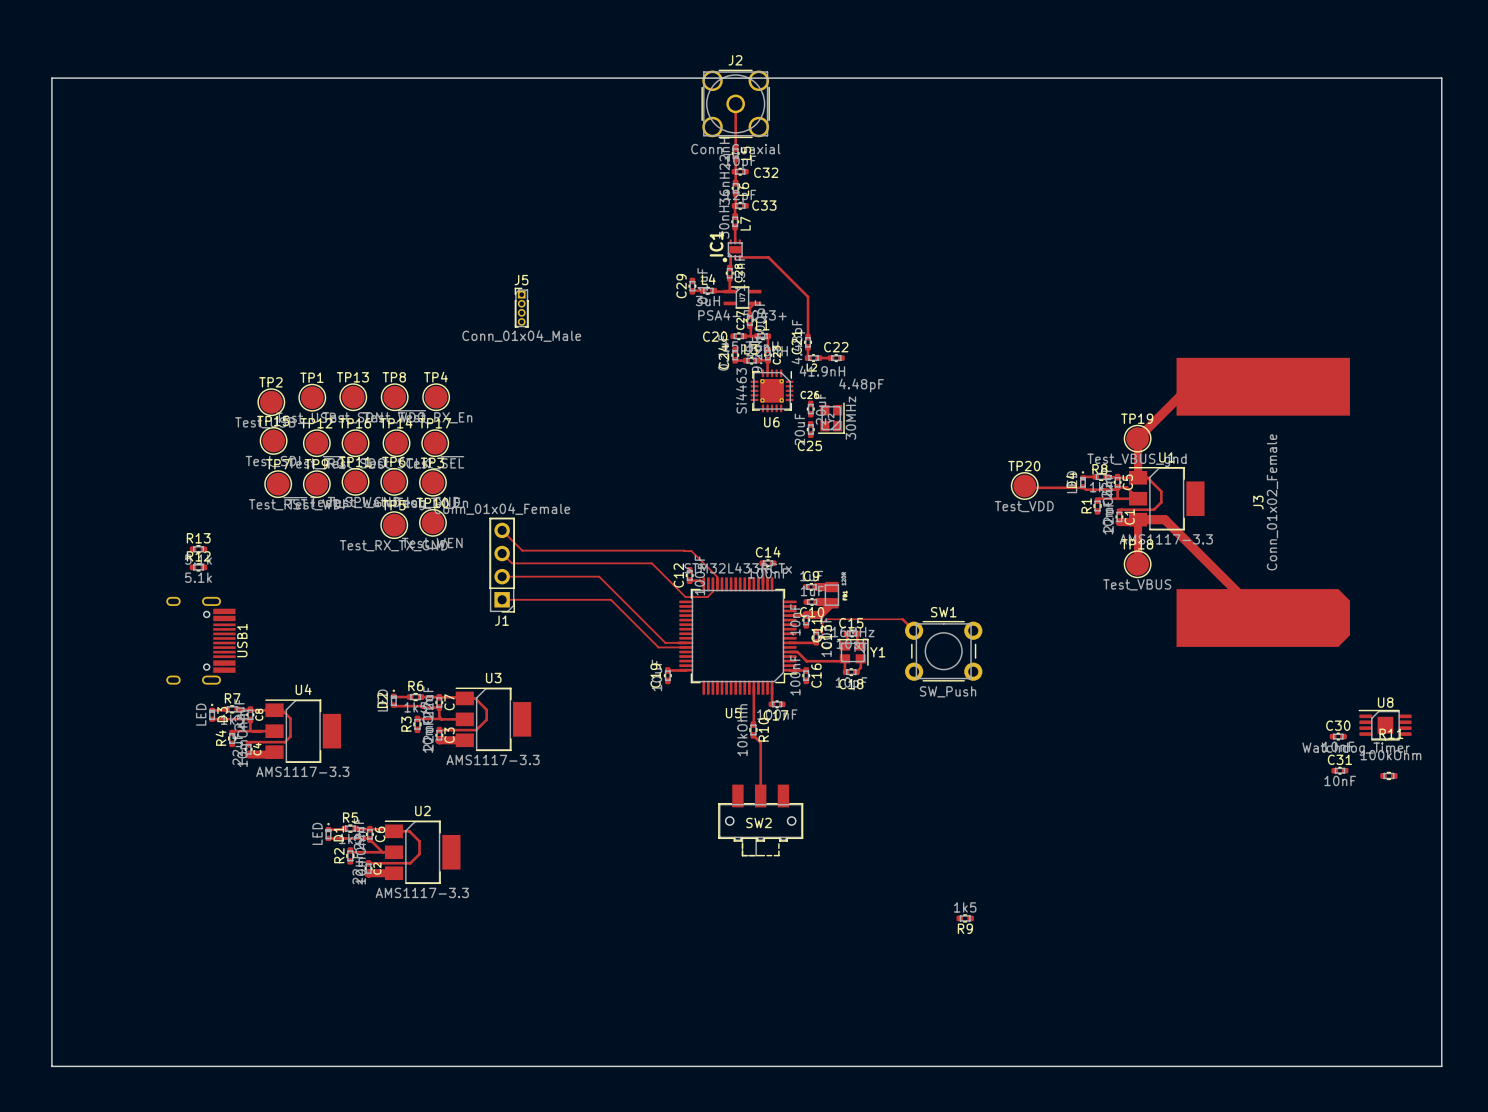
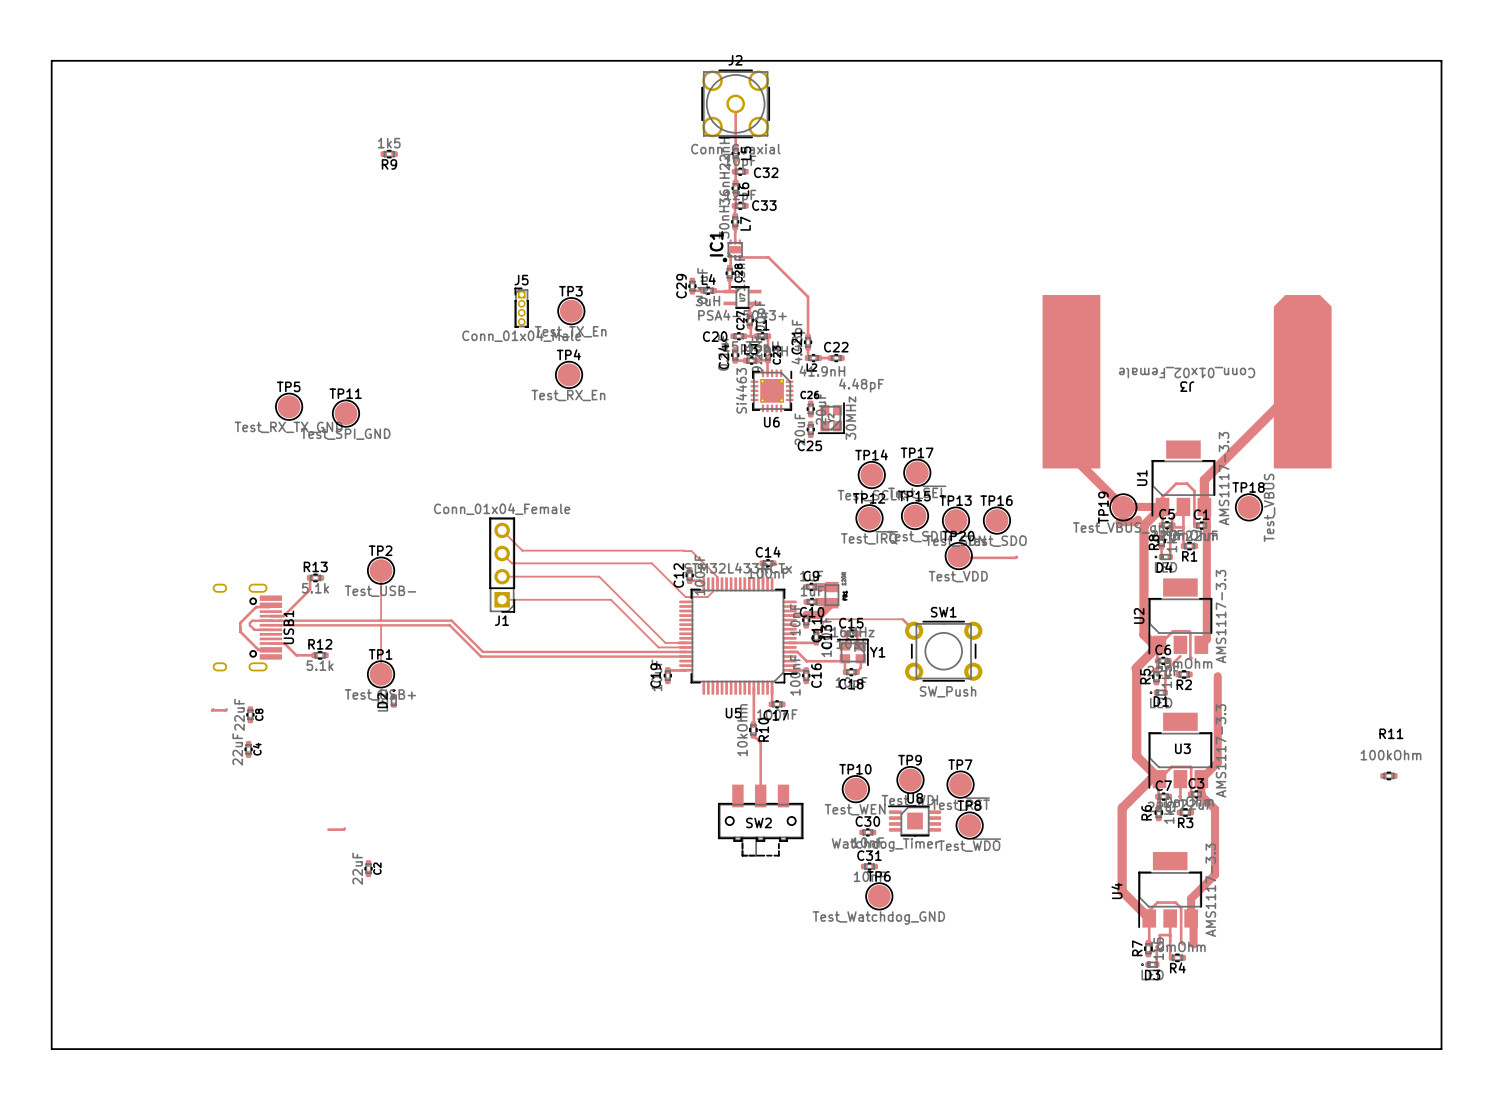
board edge: (51, 78) (1441, 78) (1441, 1066) (51, 1066) (51, 78) -> (51, 60) (1441, 60) (1441, 1049) (51, 1049) (51, 60)
track: none -> (1302, 381) (1204, 480) (1204, 506) (1206, 509) (1206, 639) (1201, 644)
track: (1263, 386) (1189, 386) (1137, 438) (1137, 477) -> none
TP1 position: (312, 397) -> (381, 674)
TP13 position: (353, 397) -> (955, 520)
TP8 position: (394, 397) -> (969, 825)
TP4 position: (436, 397) -> (569, 374)
TP2 position: (271, 402) -> (381, 570)
TP19 name rotation: 0° (1137, 418) -> 90° counterclockwise (1103, 507)
TP19 position: (1137, 438) -> (1123, 507)
TP15 position: (273, 440) -> (915, 516)
TP12 position: (316, 443) -> (869, 518)
TP16 position: (355, 443) -> (996, 520)
TP14 position: (396, 443) -> (871, 475)
TP17 position: (435, 443) -> (917, 472)
track: none -> (1071, 455) (1123, 507) (1162, 506) (1144, 525)
track: (1083, 476) (1095, 476) -> none
R8 rotation: 0° (1101, 476) -> 90° clockwise (1161, 541)
R8 position: (1101, 476) -> (1161, 541)
track: (1106, 477) (1147, 477) (1161, 491) (1161, 502) (1153, 509) (1121, 509) (1119, 511) -> none
D4 rotation: 0° (1083, 480) -> 90° counterclockwise (1163, 556)
D4 position: (1083, 480) -> (1163, 556)
TP11 position: (355, 481) -> (346, 413)
TP6 position: (394, 481) -> (879, 896)
TP3 position: (432, 482) -> (571, 311)
C5 rotation: 0° (1117, 482) -> 90° clockwise (1167, 525)
C5 position: (1117, 482) -> (1167, 525)
TP7 position: (278, 484) -> (960, 784)
TP9 position: (316, 484) -> (910, 780)
TP20 position: (1024, 485) -> (958, 556)
track: (1117, 487) (1117, 498) -> none
track: (1117, 487) (1126, 487) (1138, 498) (1099, 498) (1097, 500) -> none
track: (1117, 487) (1115, 489) (1085, 489) (1083, 486) (1028, 487) -> none
U1 rotation: 0° (1166, 498) -> 90° counterclockwise (1183, 478)
J3 rotation: 0° (1263, 502) -> 90° counterclockwise (1187, 381)
R1 rotation: 0° (1097, 506) -> 90° clockwise (1189, 546)
R1 position: (1097, 506) -> (1189, 546)
C1 rotation: 0° (1119, 516) -> 90° clockwise (1201, 525)
C1 position: (1119, 516) -> (1201, 525)
TP10 position: (432, 522) -> (855, 789)
TP5 position: (394, 525) -> (289, 406)
track: none -> (1196, 525) (1194, 523) (1194, 491) (1187, 483) (1176, 483) (1162, 497) (1161, 527)
track: none -> (1144, 526) (1144, 634) (1154, 644) (1159, 644) (1135, 668)
track: none -> (1172, 527) (1183, 527)
track: none -> (1172, 527) (1172, 518) (1183, 506) (1183, 545) (1185, 547)
track: none -> (1172, 527) (1170, 529) (1170, 554)
R13 position: (198, 549) -> (315, 577)
track: none -> (1161, 549) (1161, 556)
track: none -> (1017, 556) (962, 557)
track: (1137, 564) (1138, 519) (1164, 519) (1263, 617) -> none
TP18 position: (1137, 564) -> (1248, 507)
R12 position: (198, 567) -> (320, 655)
track: none -> (381, 570) (380, 620)
track: none -> (310, 577) (310, 589) (283, 616) (270, 616)
TP18 value rotation: 0° (1137, 584) -> 90° counterclockwise (1269, 507)
track: none -> (270, 605) (269, 607) (256, 607) (240, 623) (240, 631) (258, 649) (270, 649)
track: none -> (270, 620) (252, 620) (249, 625) (254, 629) (280, 629)
track: none -> (280, 620) (451, 620) (482, 651) (686, 651)
track: none -> (279, 625) (449, 625) (480, 656) (686, 656)
track: none -> (381, 625) (381, 674)
USB1 position: (200, 640) -> (247, 627)
track: none -> (270, 643) (284, 643) (296, 655) (314, 655)
track: none -> (1180, 656) (1165, 671) (1165, 692)
track: none -> (1191, 658) (1190, 632) (1173, 631) (1157, 646) (1157, 668)
track: none -> (1136, 668) (1136, 756) (1159, 779) (1151, 779) (1122, 808)
track: none -> (1217, 676) (1217, 762) (1201, 779) (1201, 795) (1215, 809) (1215, 874) (1191, 898) (1193, 944)
U3 name position: U3 (493, 678) -> U3 (1182, 748)
track: (393, 696) (410, 697) -> none
R6 rotation: 0° (415, 697) -> 90° clockwise (1158, 812)
R6 position: (415, 697) -> (1158, 812)
track: (421, 697) (475, 698) (486, 709) (486, 719) (476, 730) (439, 730) -> none
C7 rotation: 0° (439, 702) -> 90° clockwise (1163, 796)
C7 position: (439, 702) -> (1163, 796)
track: (393, 705) (422, 707) -> none
track: (423, 707) (439, 707) (439, 717) (441, 719) (464, 719) -> none
R7 rotation: 0° (232, 709) -> 90° clockwise (1148, 948)
R7 position: (232, 709) -> (1148, 948)
track: (237, 709) (282, 710) (290, 718) (290, 736) (284, 742) (250, 742) (248, 744) -> none
D3 rotation: 0° (212, 712) -> 90° counterclockwise (1150, 964)
D3 position: (212, 712) -> (1150, 964)
track: (417, 718) (441, 718) -> none
track: (212, 719) (249, 719) (250, 729) -> none
U3 rotation: 0° (493, 719) -> 90° counterclockwise (1180, 750)
U3 position: (493, 719) -> (1180, 750)
R3 rotation: 0° (417, 724) -> 90° clockwise (1185, 812)
R3 position: (417, 724) -> (1185, 812)
U8 position: (1385, 725) -> (914, 821)
track: (274, 731) (234, 731) (232, 733) -> none
U4 rotation: 0° (303, 731) -> 90° counterclockwise (1170, 889)
U4 position: (303, 731) -> (1170, 889)
C3 rotation: 0° (439, 735) -> 90° clockwise (1196, 794)
C3 position: (439, 735) -> (1196, 794)
C30 position: (1338, 736) -> (867, 832)
R4 rotation: 0° (232, 738) -> 90° clockwise (1177, 957)
R4 position: (232, 738) -> (1177, 957)
track: (464, 740) (439, 740) -> none
track: (274, 752) (272, 754) (248, 754) -> none
C31 position: (1339, 770) -> (869, 866)
track: none -> (1180, 779) (1180, 797) (1179, 796)
track: none -> (1191, 794) (1191, 767) (1171, 766) (1158, 780) (1158, 804)
track: none -> (1122, 808) (1122, 891) (1149, 918)
R5 rotation: 0° (350, 828) -> 90° clockwise (1156, 676)
R5 position: (350, 828) -> (1156, 676)
track: (355, 828) (409, 831) (419, 841) (419, 854) (410, 863) (368, 863) -> none
D1 rotation: 0° (328, 832) -> 90° counterclockwise (1159, 692)
D1 position: (328, 832) -> (1159, 692)
C6 rotation: 0° (369, 834) -> 90° clockwise (1163, 660)
C6 position: (369, 834) -> (1163, 660)
track: (328, 838) (368, 838) (382, 852) -> none
track: (350, 850) (352, 852) (394, 852) -> none
U2 rotation: 0° (422, 852) -> 90° counterclockwise (1180, 616)
U2 position: (422, 852) -> (1180, 616)
R2 rotation: 0° (350, 855) -> 90° clockwise (1184, 674)
R2 position: (350, 855) -> (1184, 674)
track: (394, 873) (368, 873) -> none
R9 position: (965, 918) -> (389, 154)
track: none -> (1170, 918) (1170, 955)
track: none -> (1170, 934) (1159, 935) (1159, 943) (1156, 946) (1156, 964)
track: none -> (1149, 942) (1149, 910) (1157, 902) (1175, 902) (1181, 908) (1181, 942) (1183, 944)

